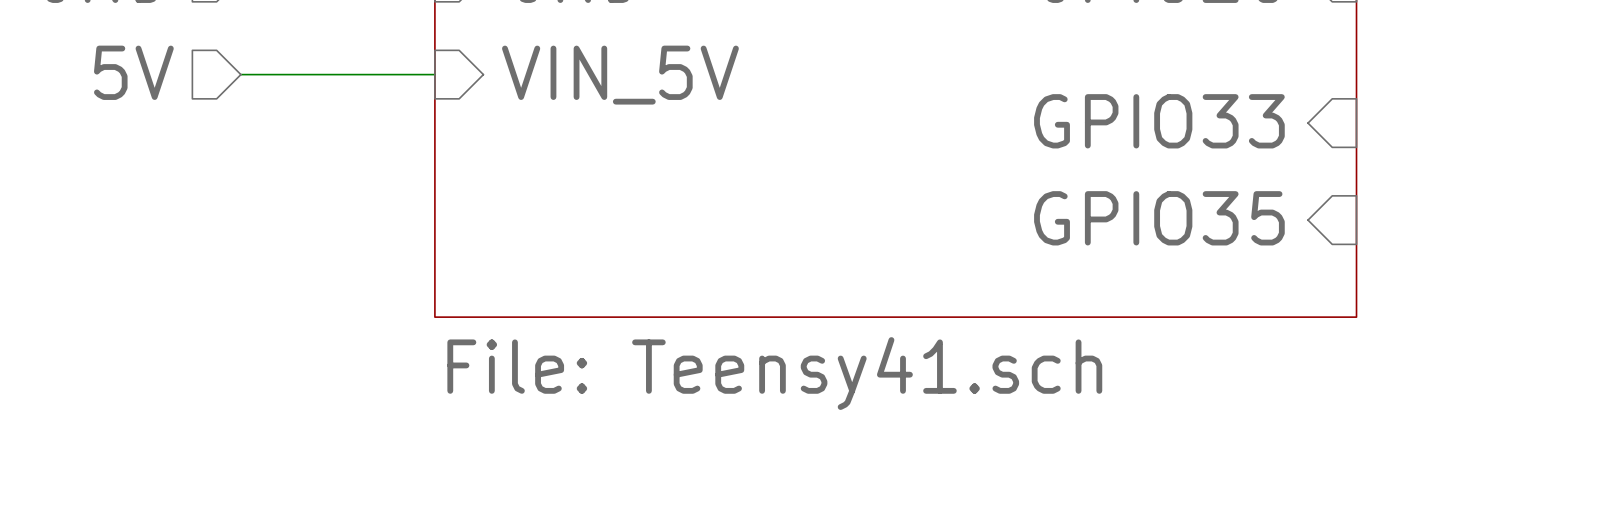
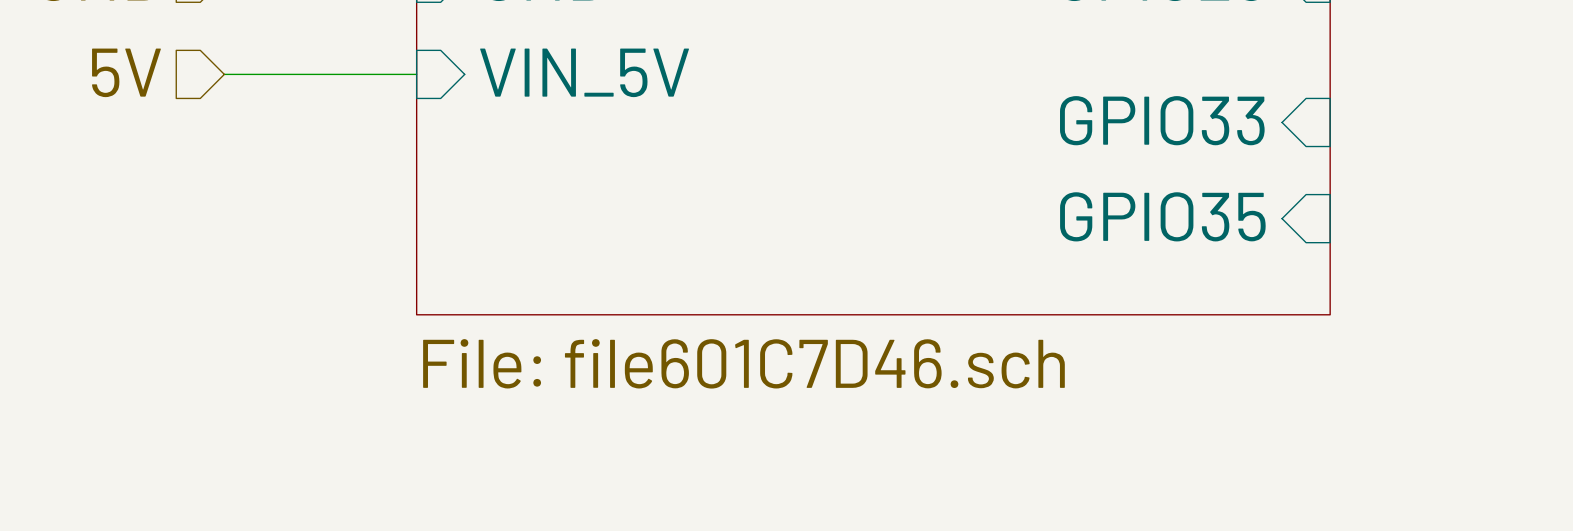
sheet value: File: Teensy41.sch (774, 373) -> File: file601C7D46.sch (743, 363)

